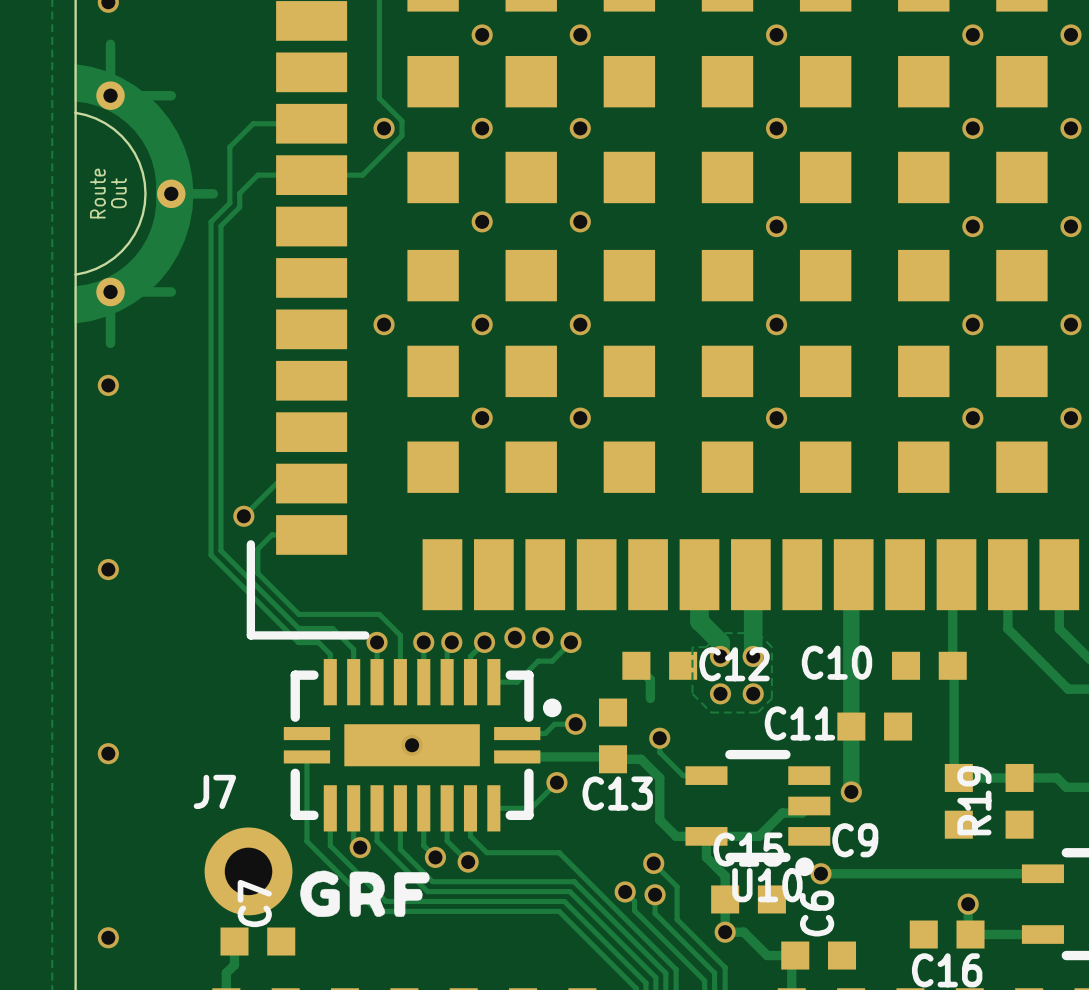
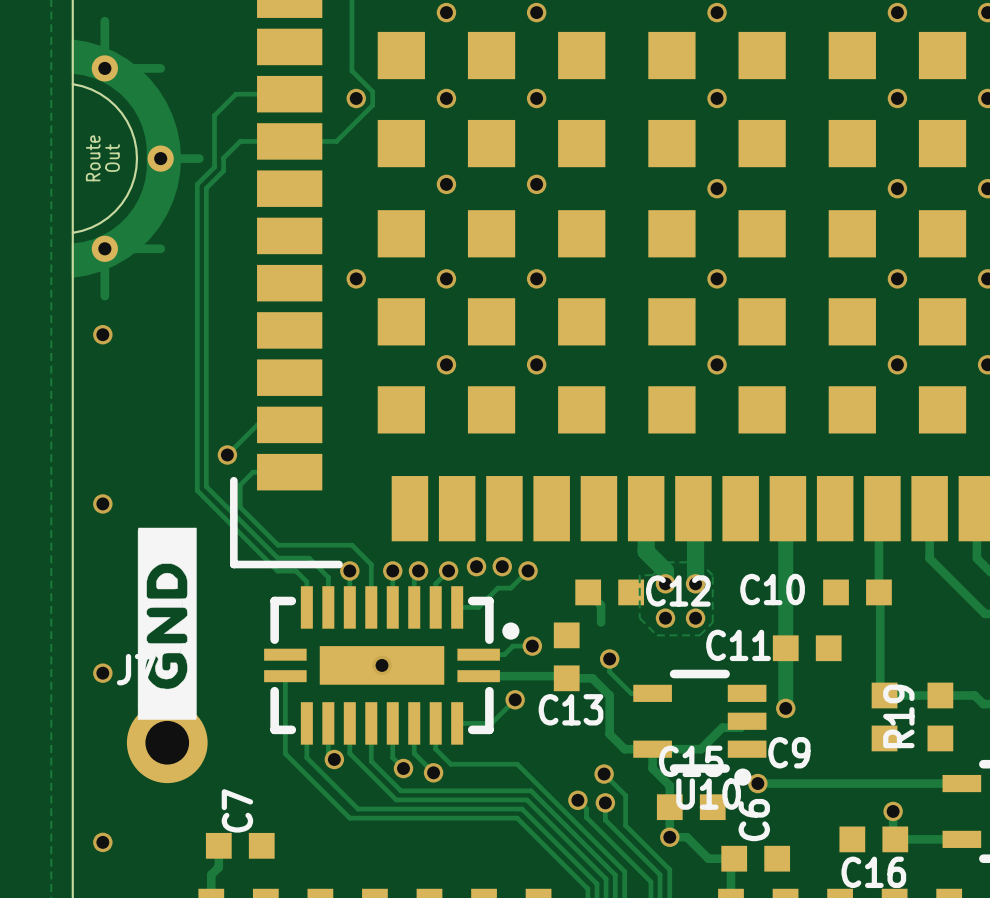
drawing: none -> [137, 527, 197, 720]
drawing: [300, 870, 430, 917] -> none
J7 position: (248, 871) -> (167, 742)

